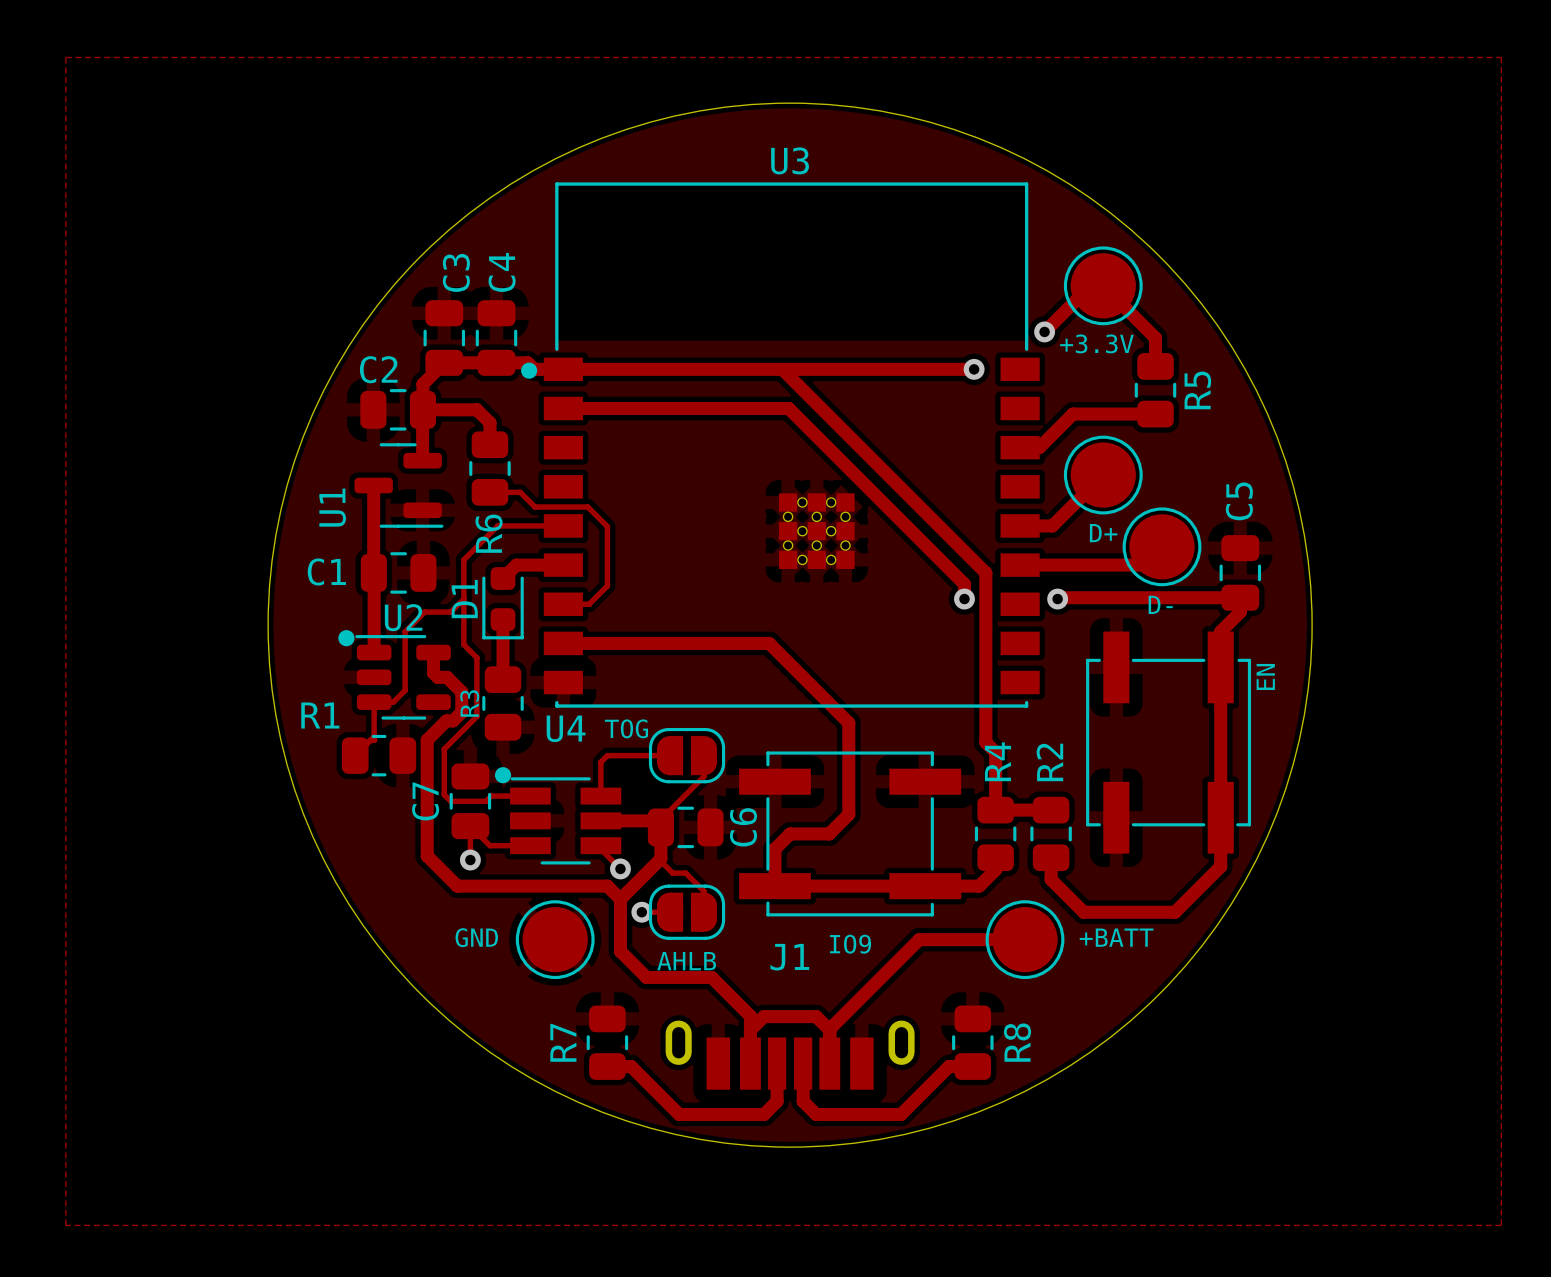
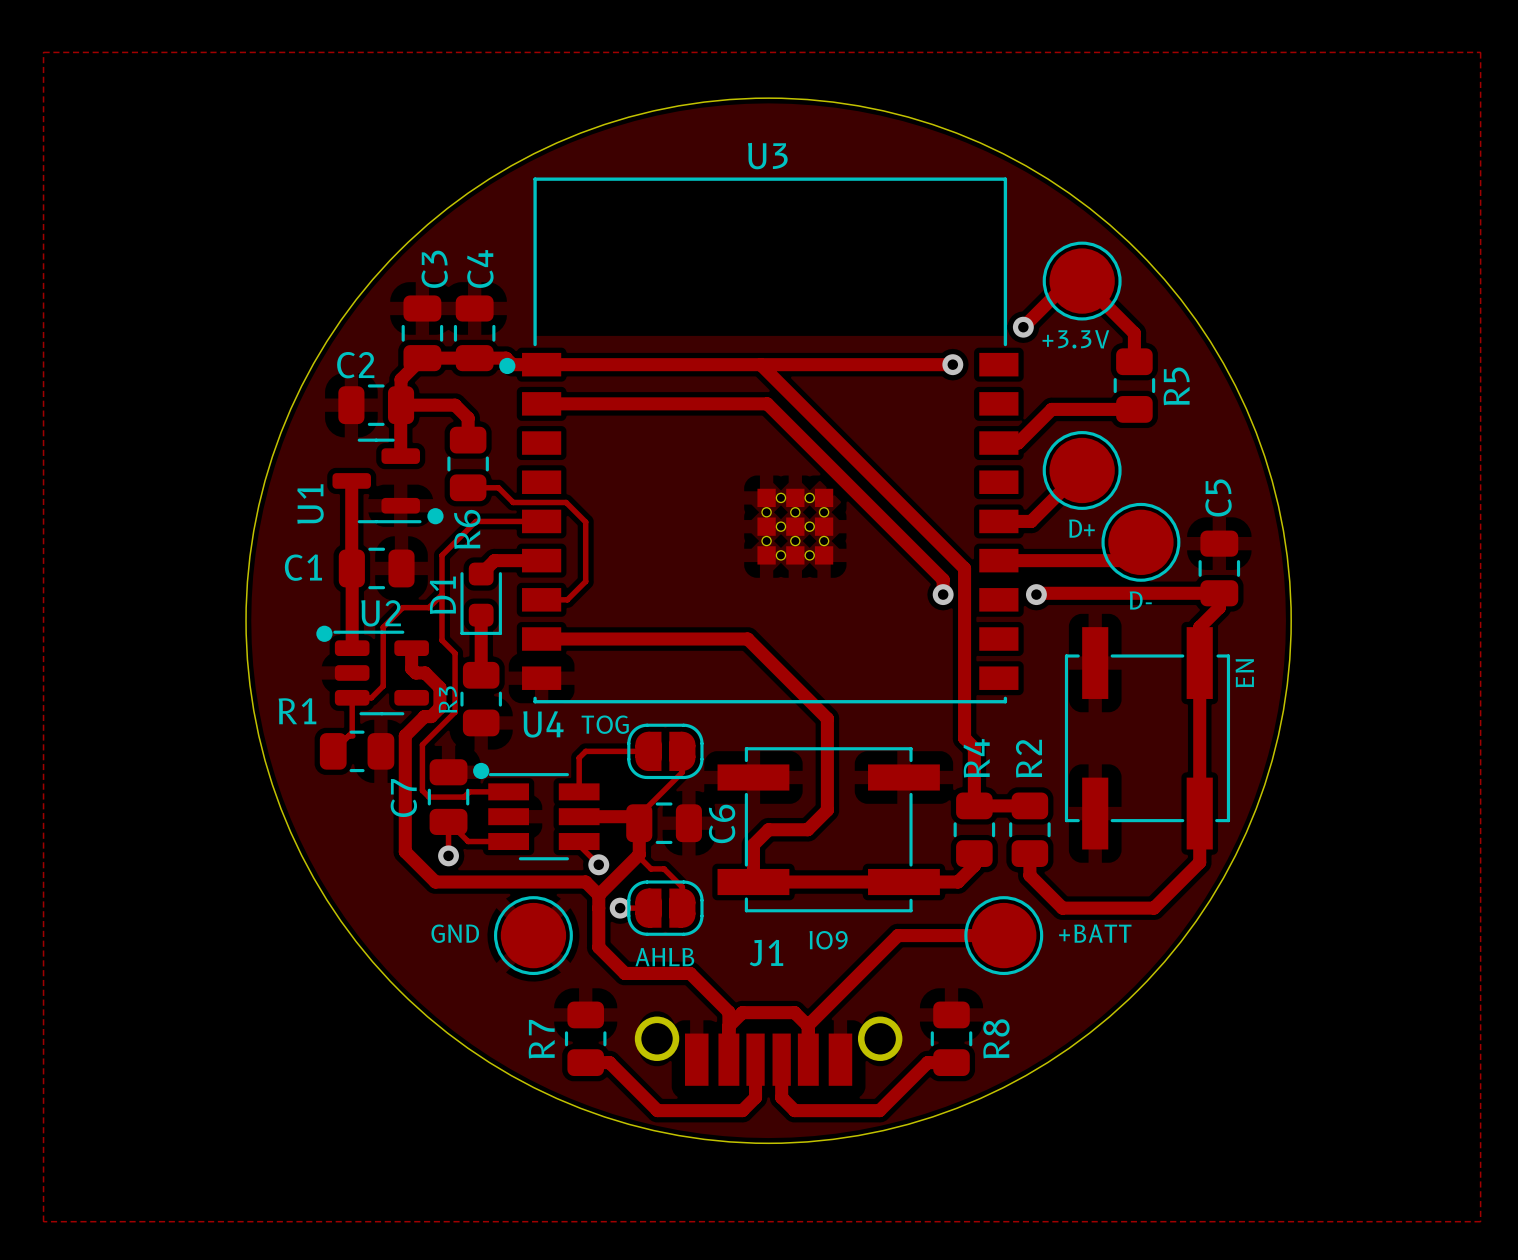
drawing: none -> [427, 508, 444, 525]
J1 footprint: [665, 1020, 915, 1090] -> [634, 1016, 903, 1086]

